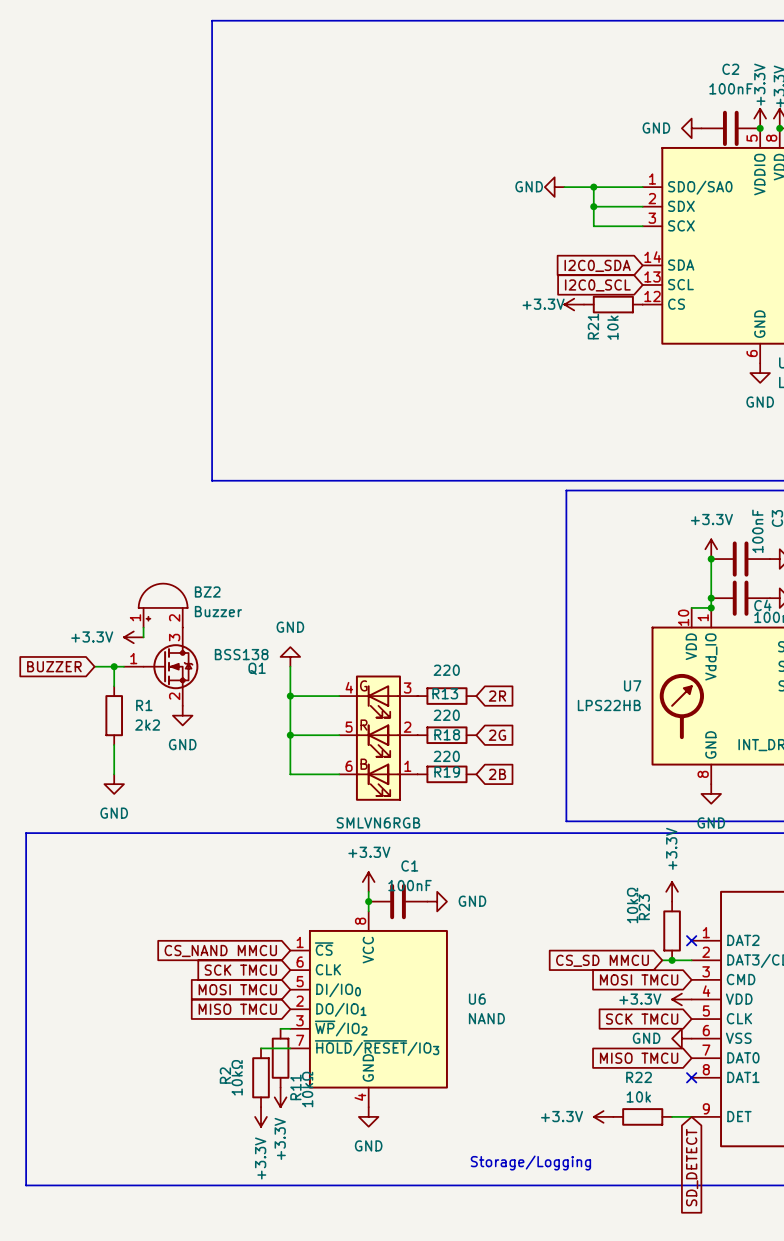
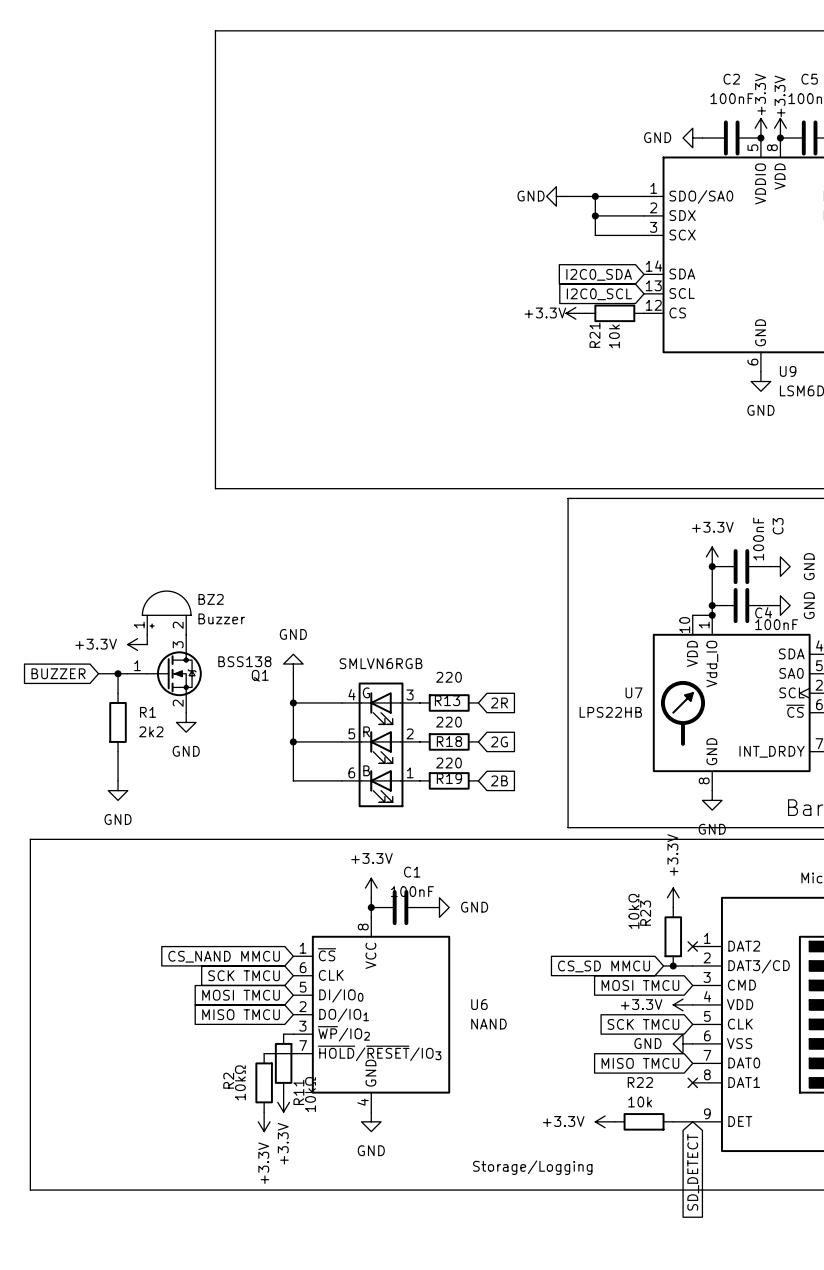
part value position: SMLVN6RGB (378, 822) -> SMLVN6RGB (381, 663)

